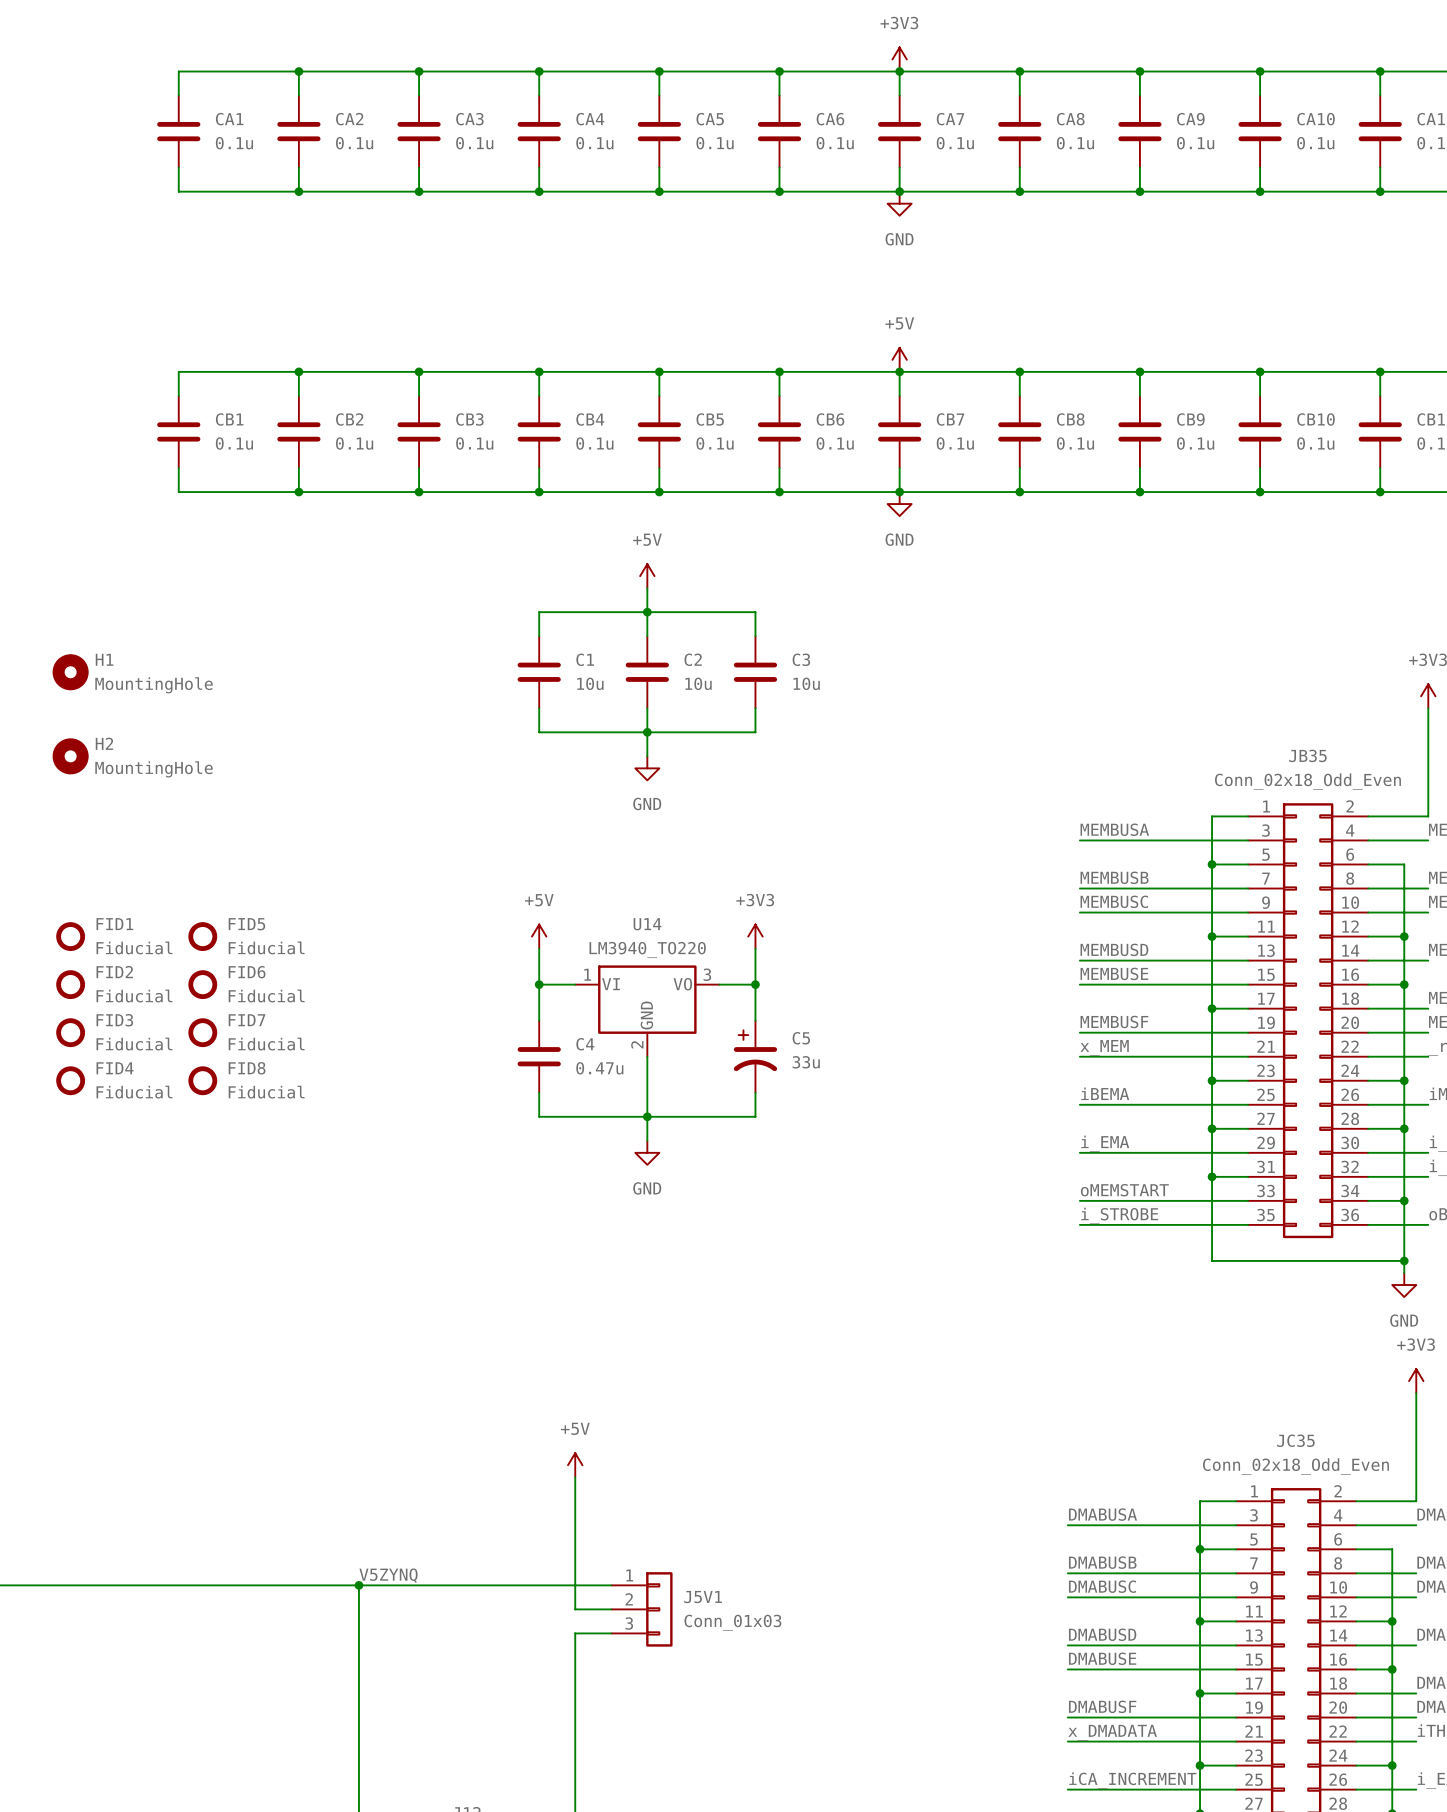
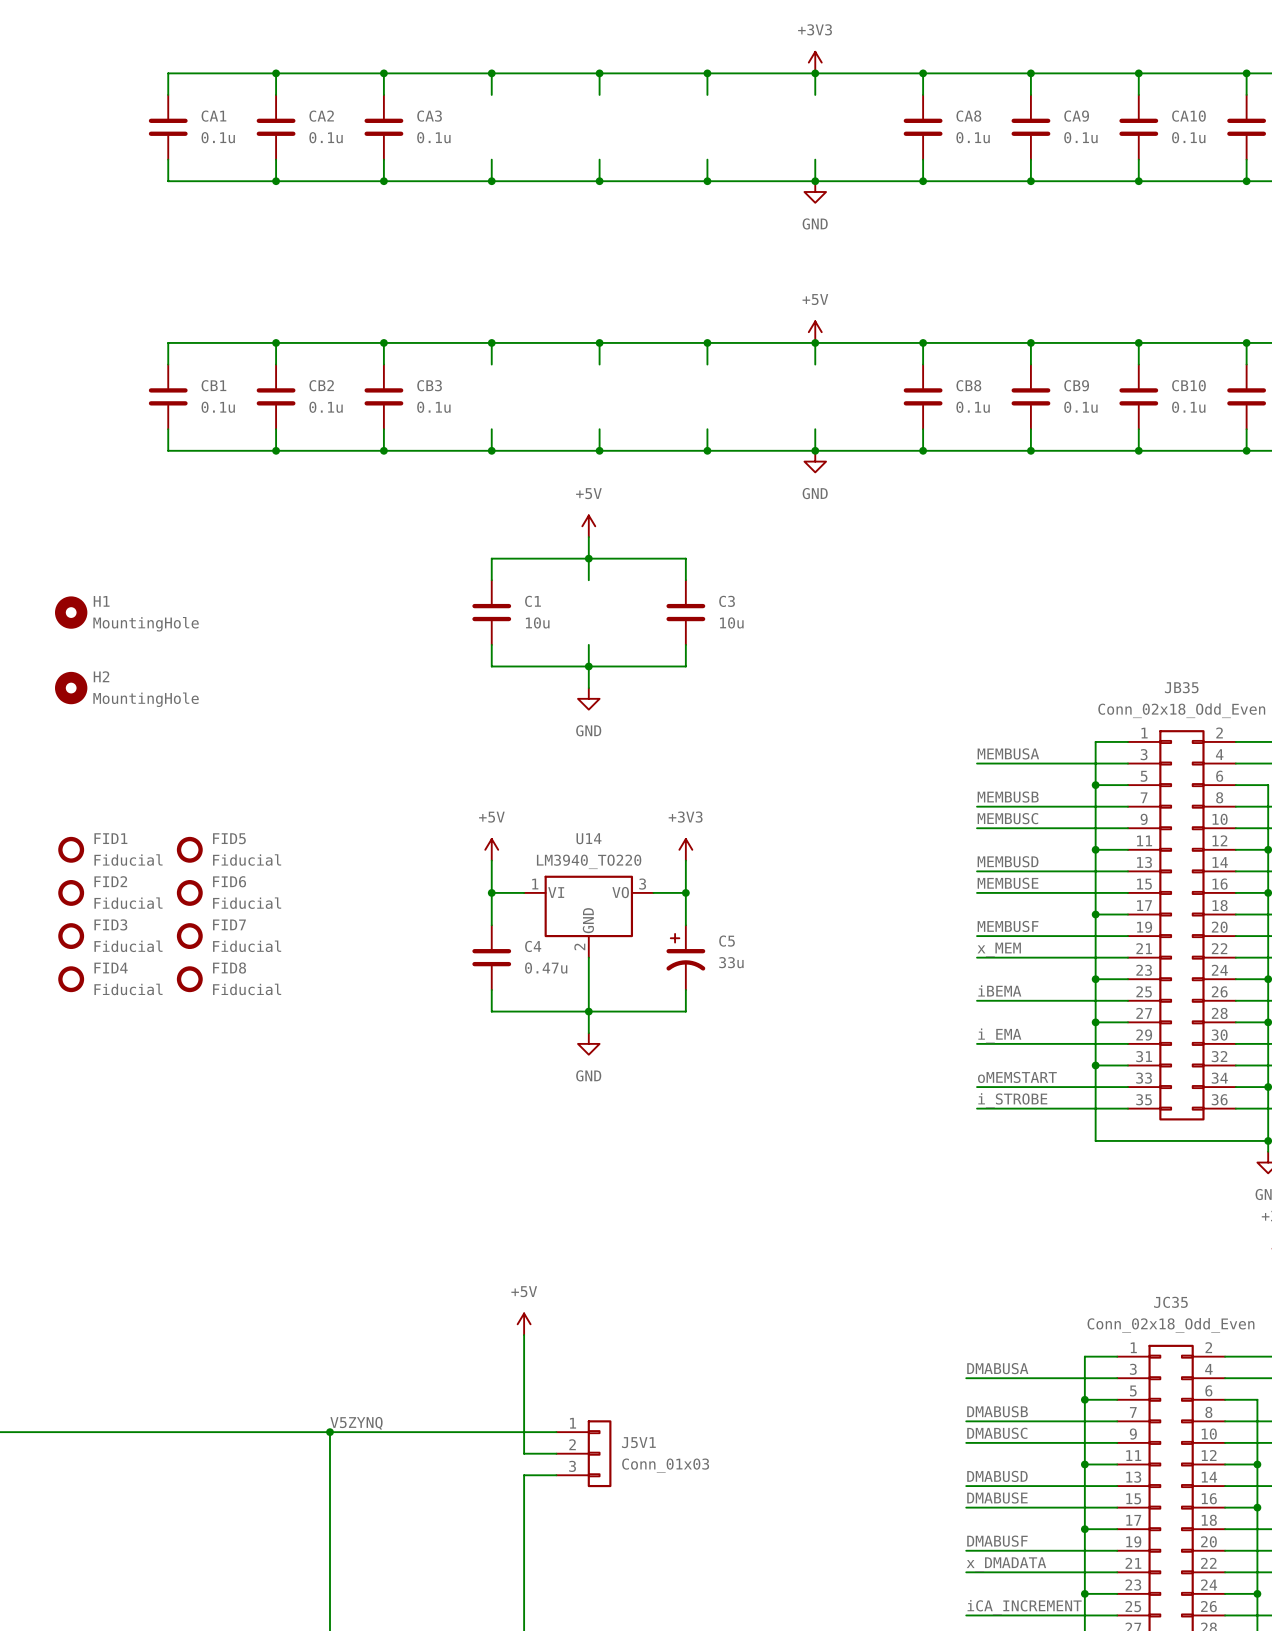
CA4: 0.1u (539, 131) -> none
CA5: 0.1u (659, 131) -> none
CA6: 0.1u (779, 131) -> none
CA7: 0.1u (899, 131) -> none
CB4: 0.1u (539, 431) -> none
CB5: 0.1u (659, 431) -> none
CB6: 0.1u (779, 431) -> none
CB7: 0.1u (899, 431) -> none
C2: 10u (647, 672) -> none

